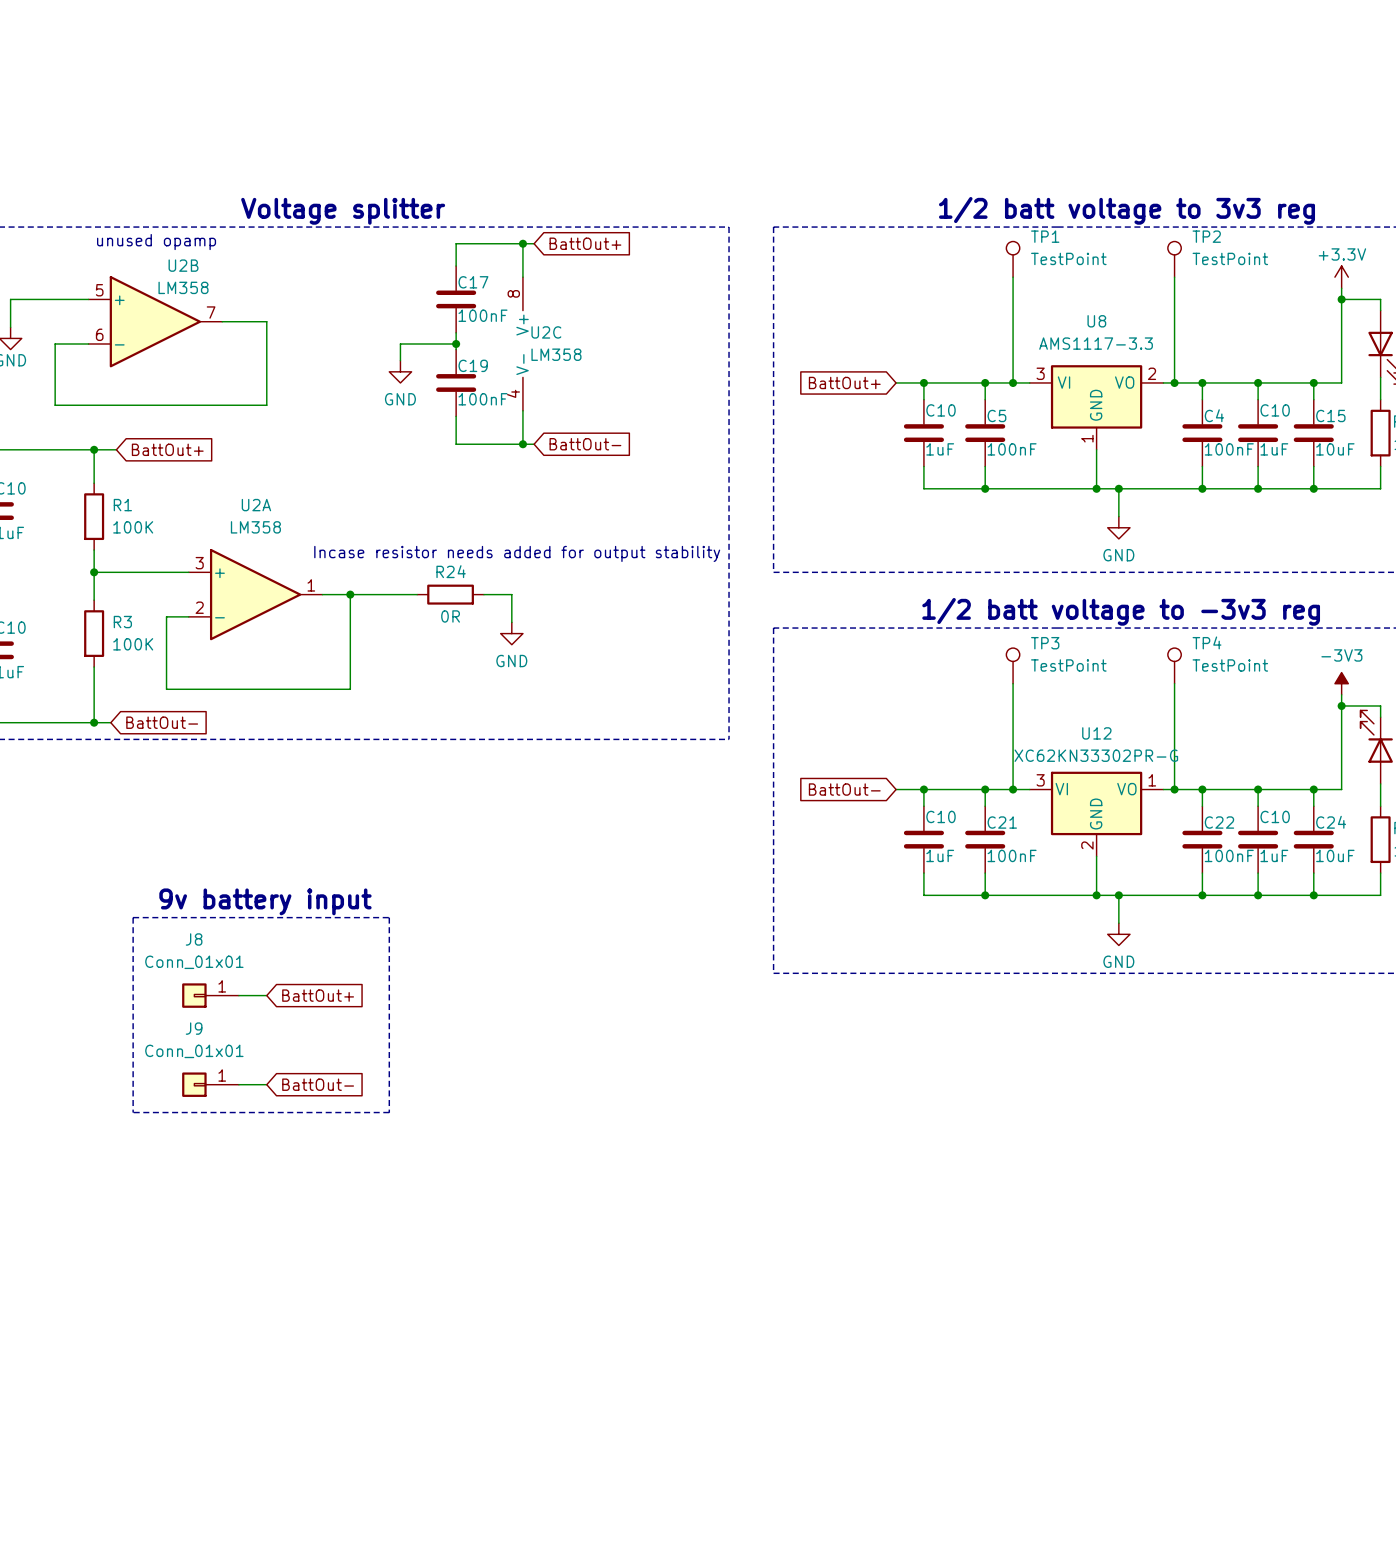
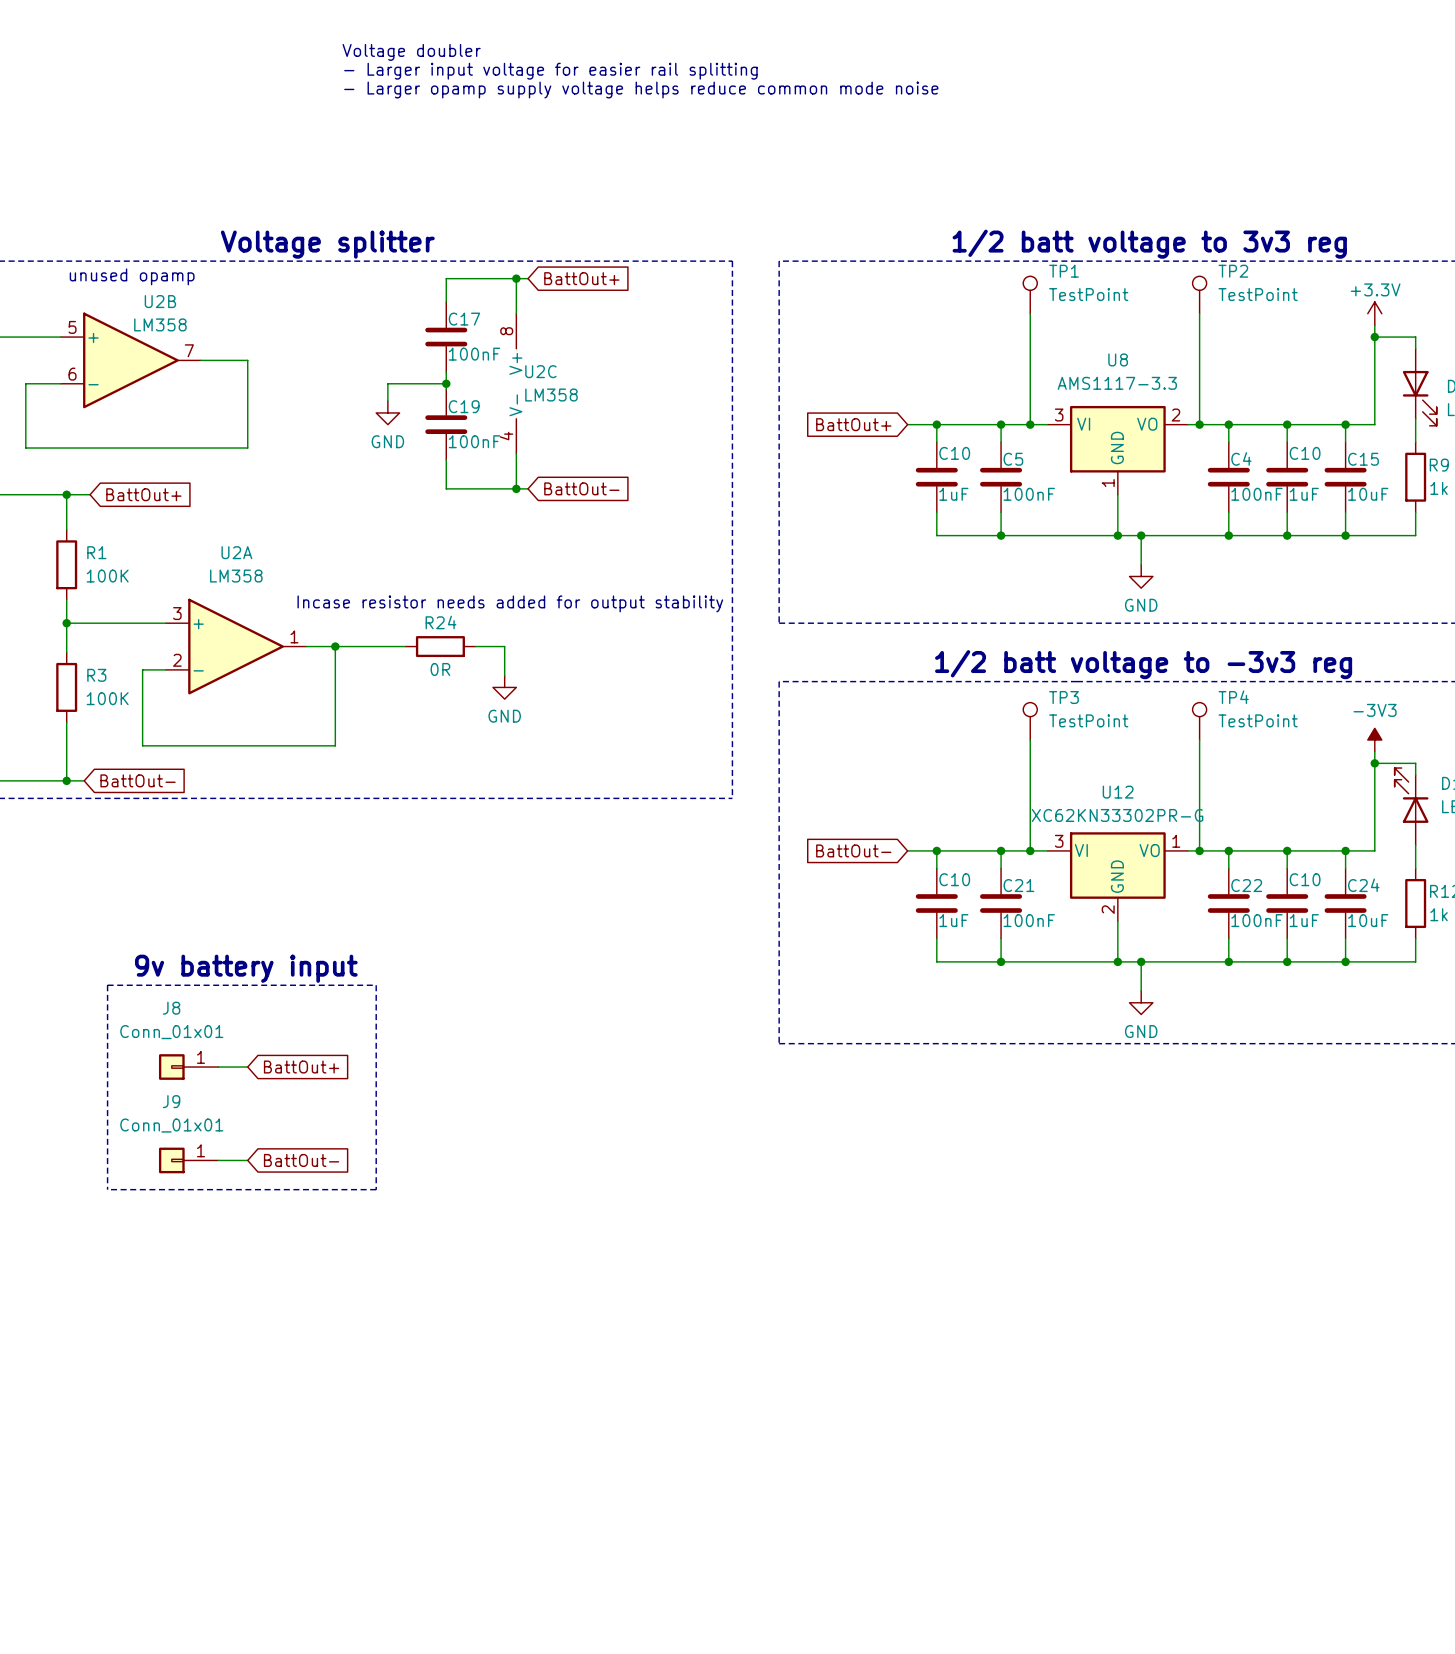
text: none -> Voltage doubler (411, 52)
text: none -> - Larger input voltage for easier rail splitting (550, 71)
text: none -> - Larger opamp supply voltage helps reduce common mode noise (641, 90)

